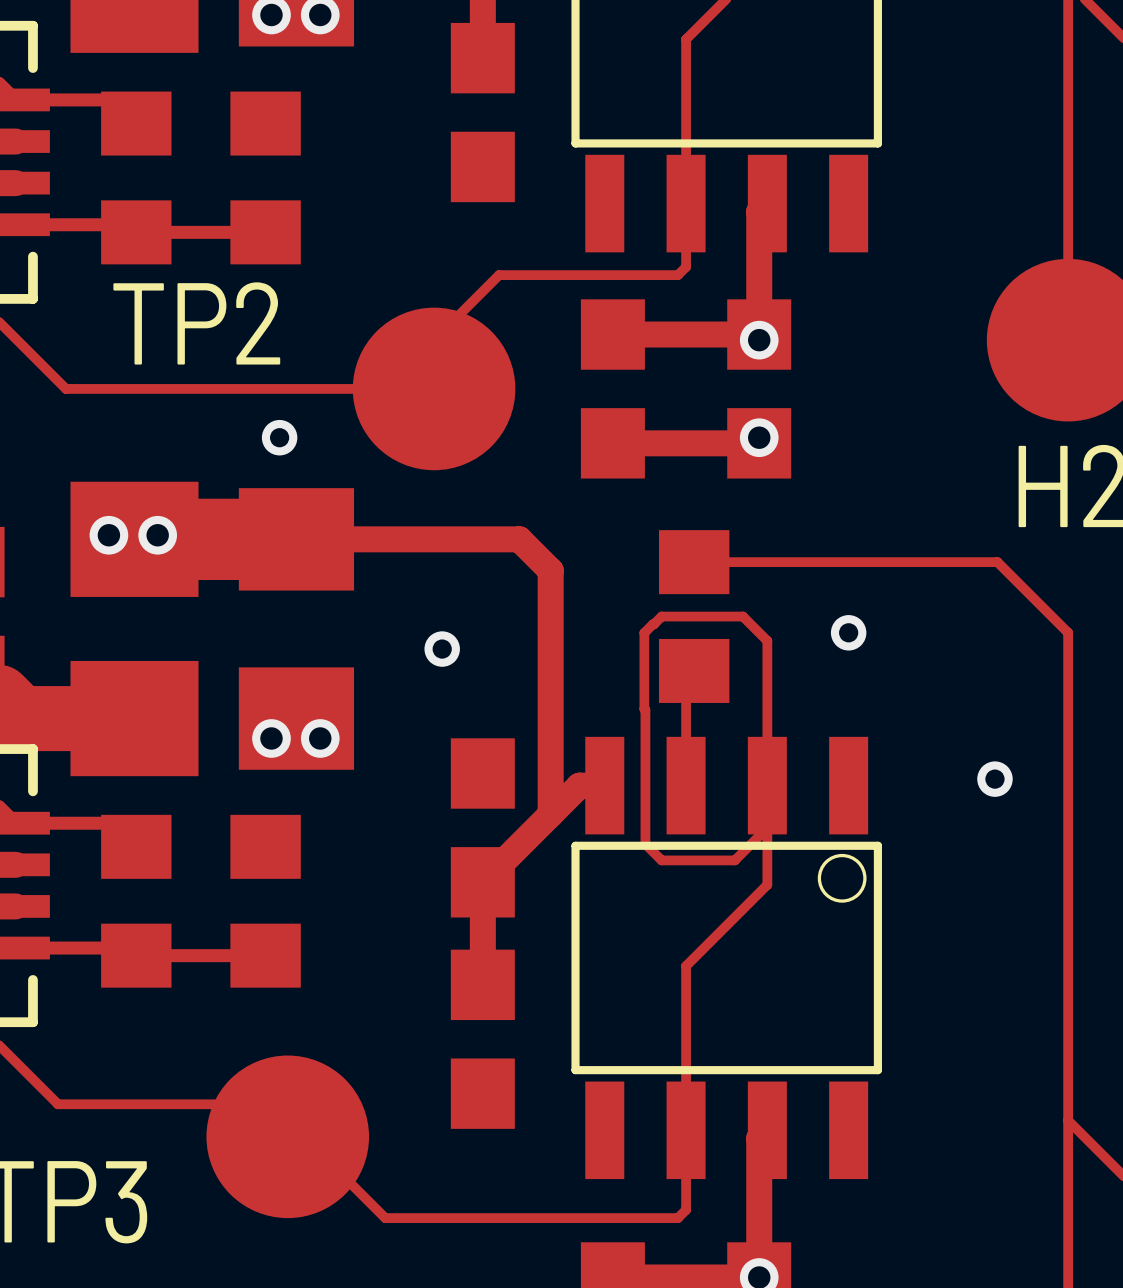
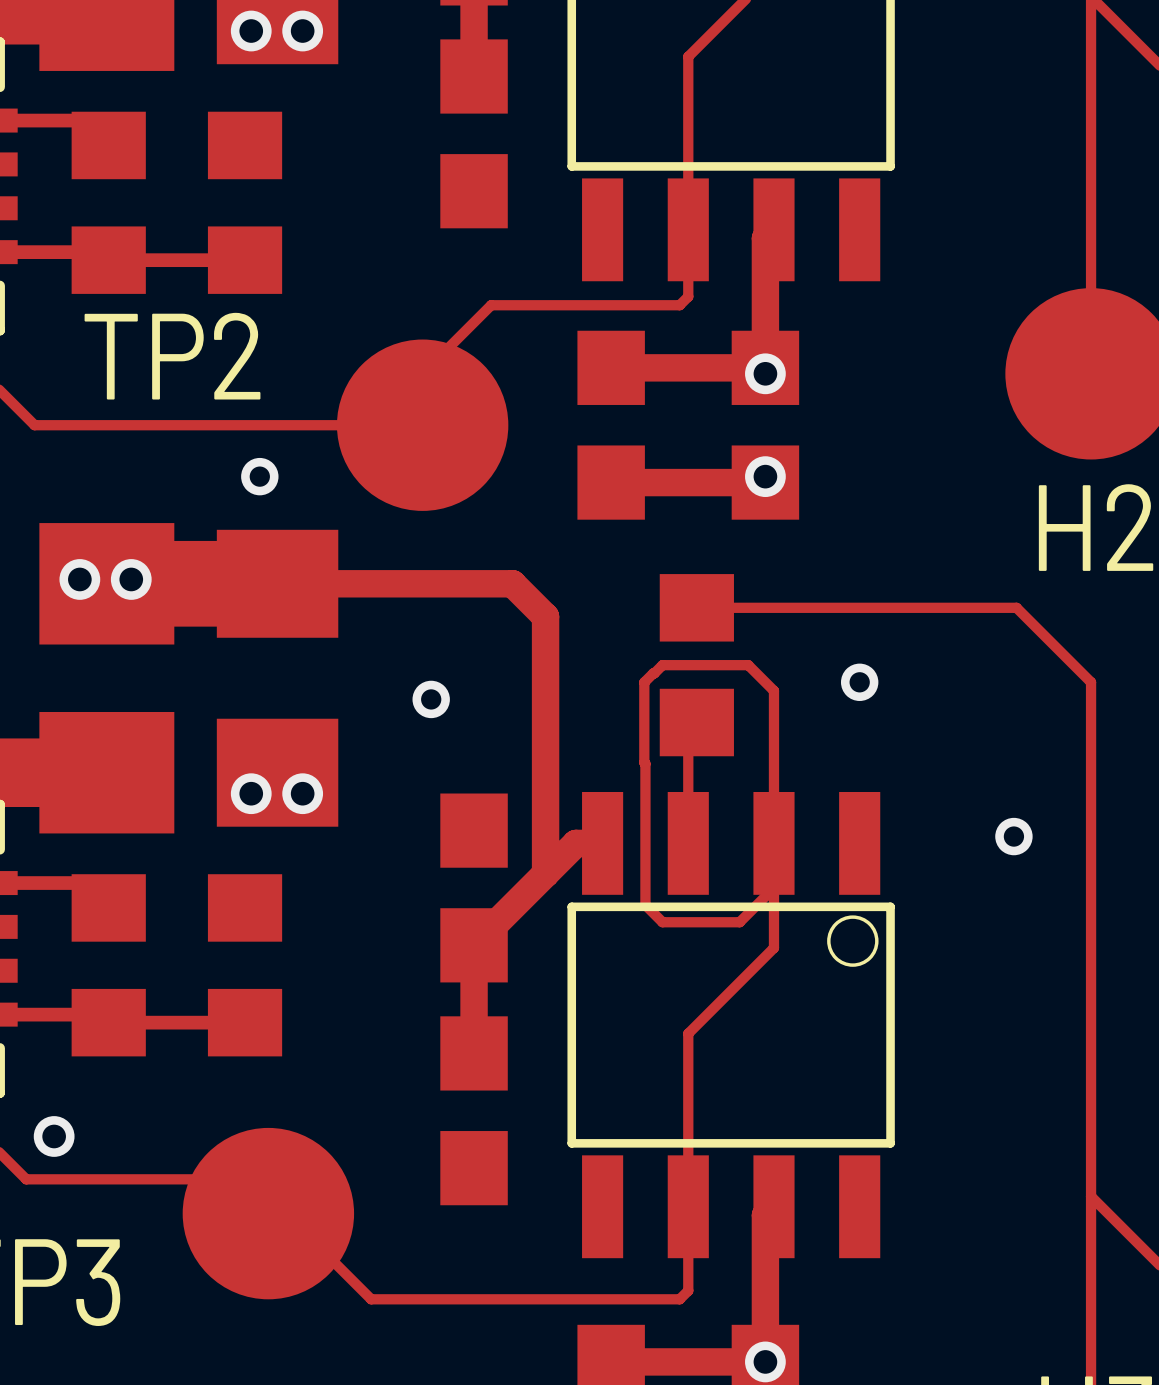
via: none -> (54, 1136)

